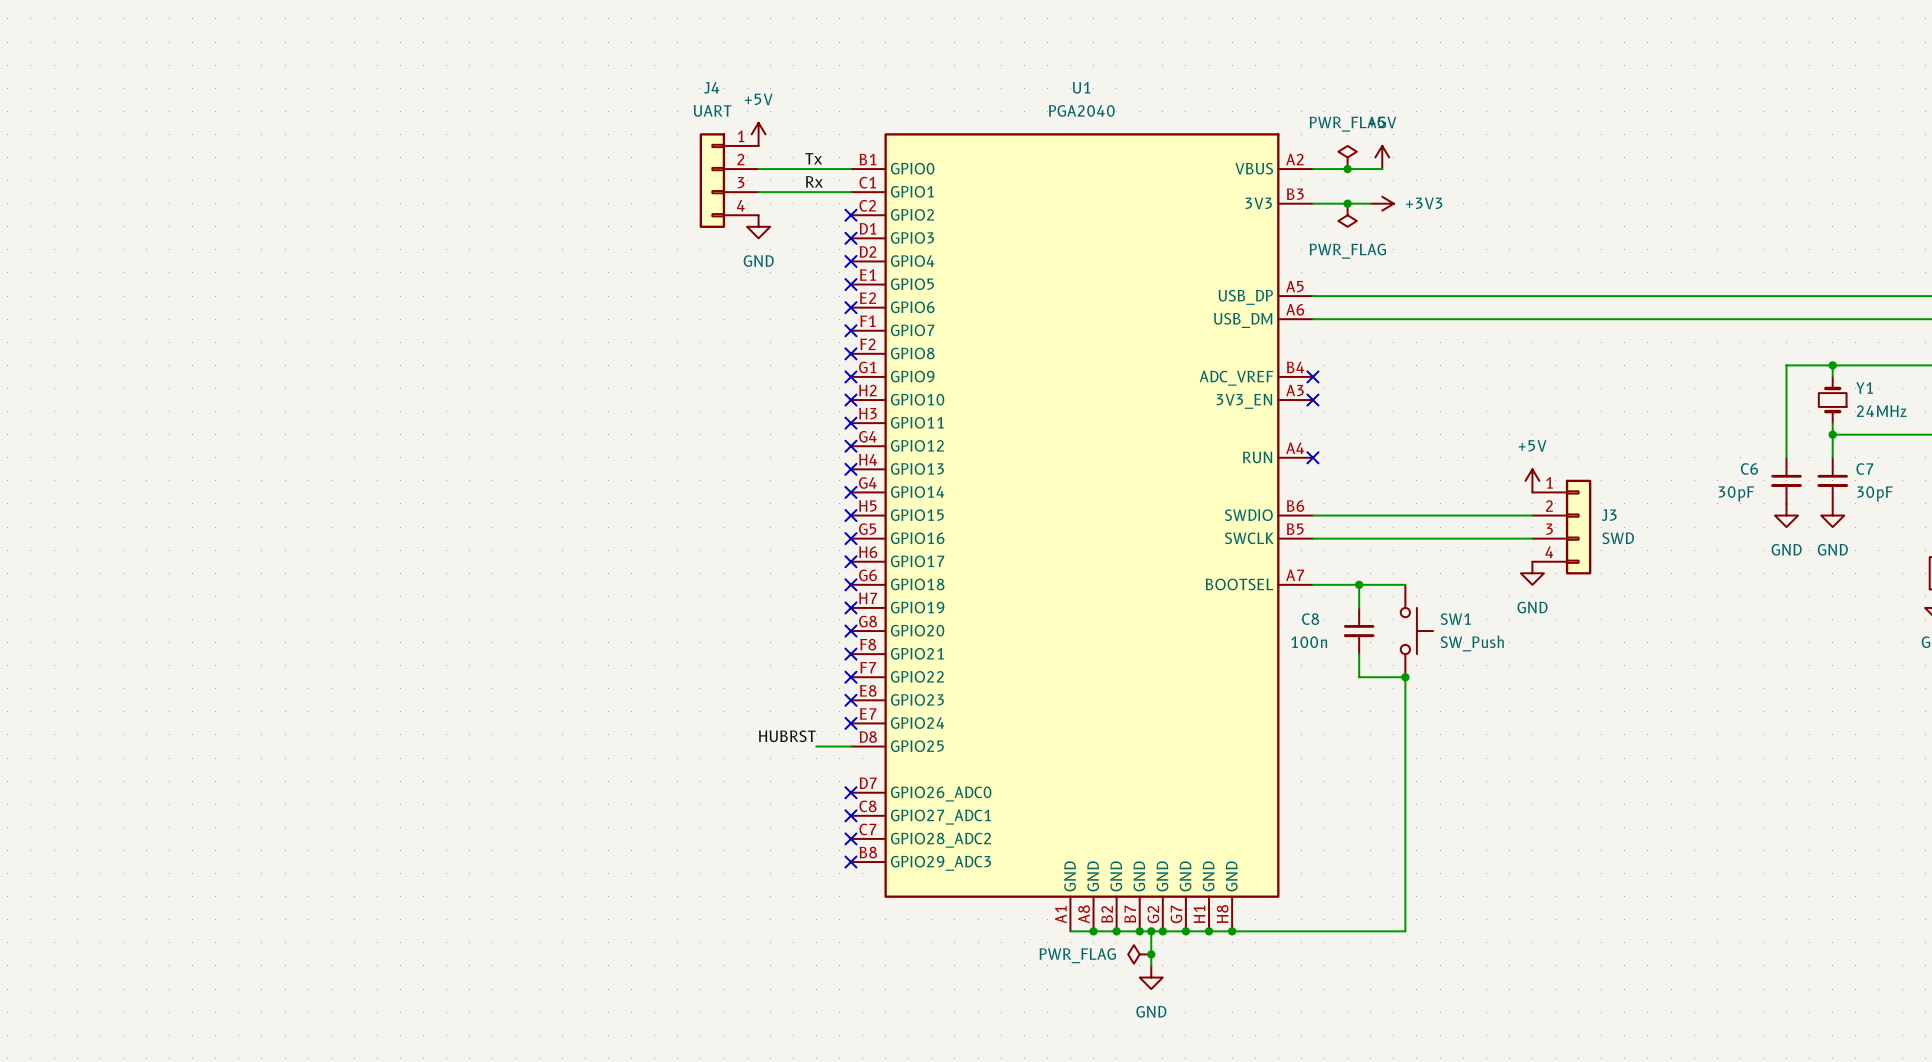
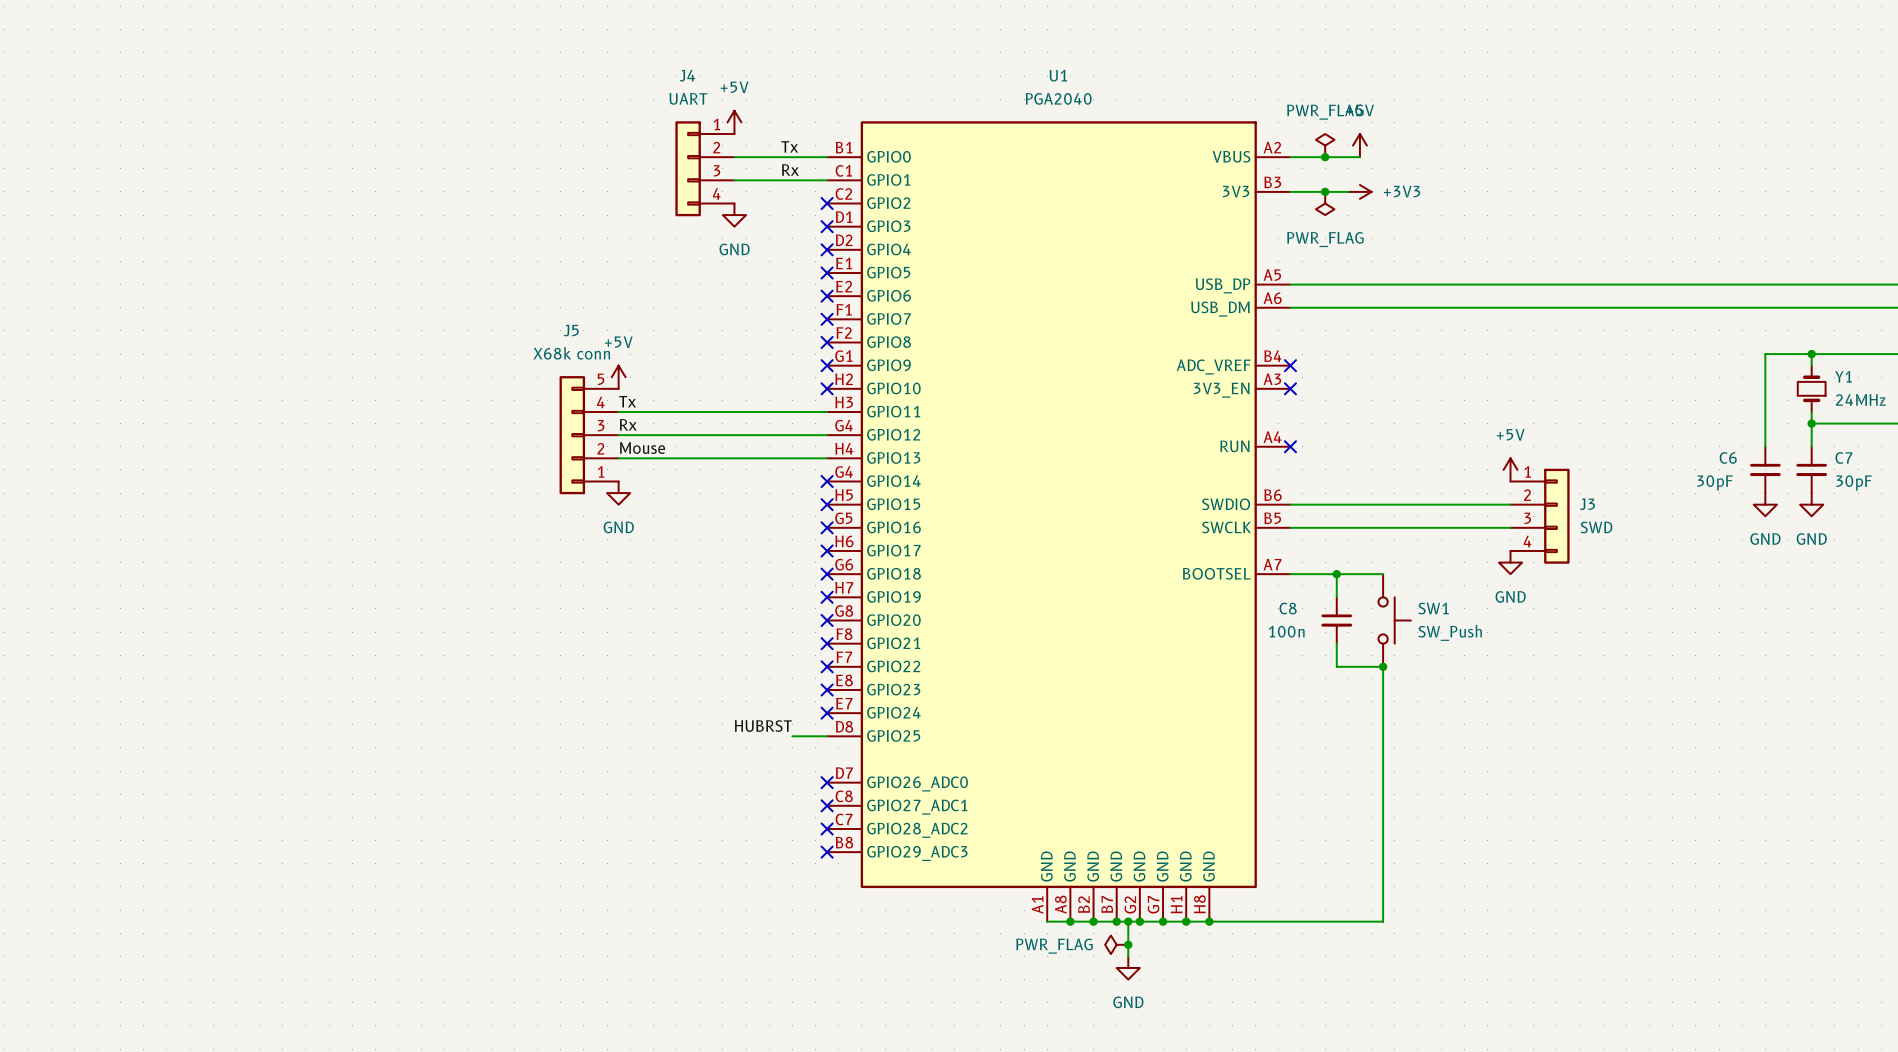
power symbol: none -> +5V (618, 377)
label: none -> Tx (627, 401)
wire: none -> (618, 411) (827, 411)
no-connect mark: (850, 423) -> none
label: none -> Rx (628, 424)
J5: none -> X68k conn (589, 435)
wire: none -> (618, 435) (827, 435)
no-connect mark: (850, 446) -> none
label: none -> Mouse (642, 448)
wire: none -> (618, 458) (827, 458)
no-connect mark: (850, 469) -> none
power symbol: none -> GND (618, 493)

